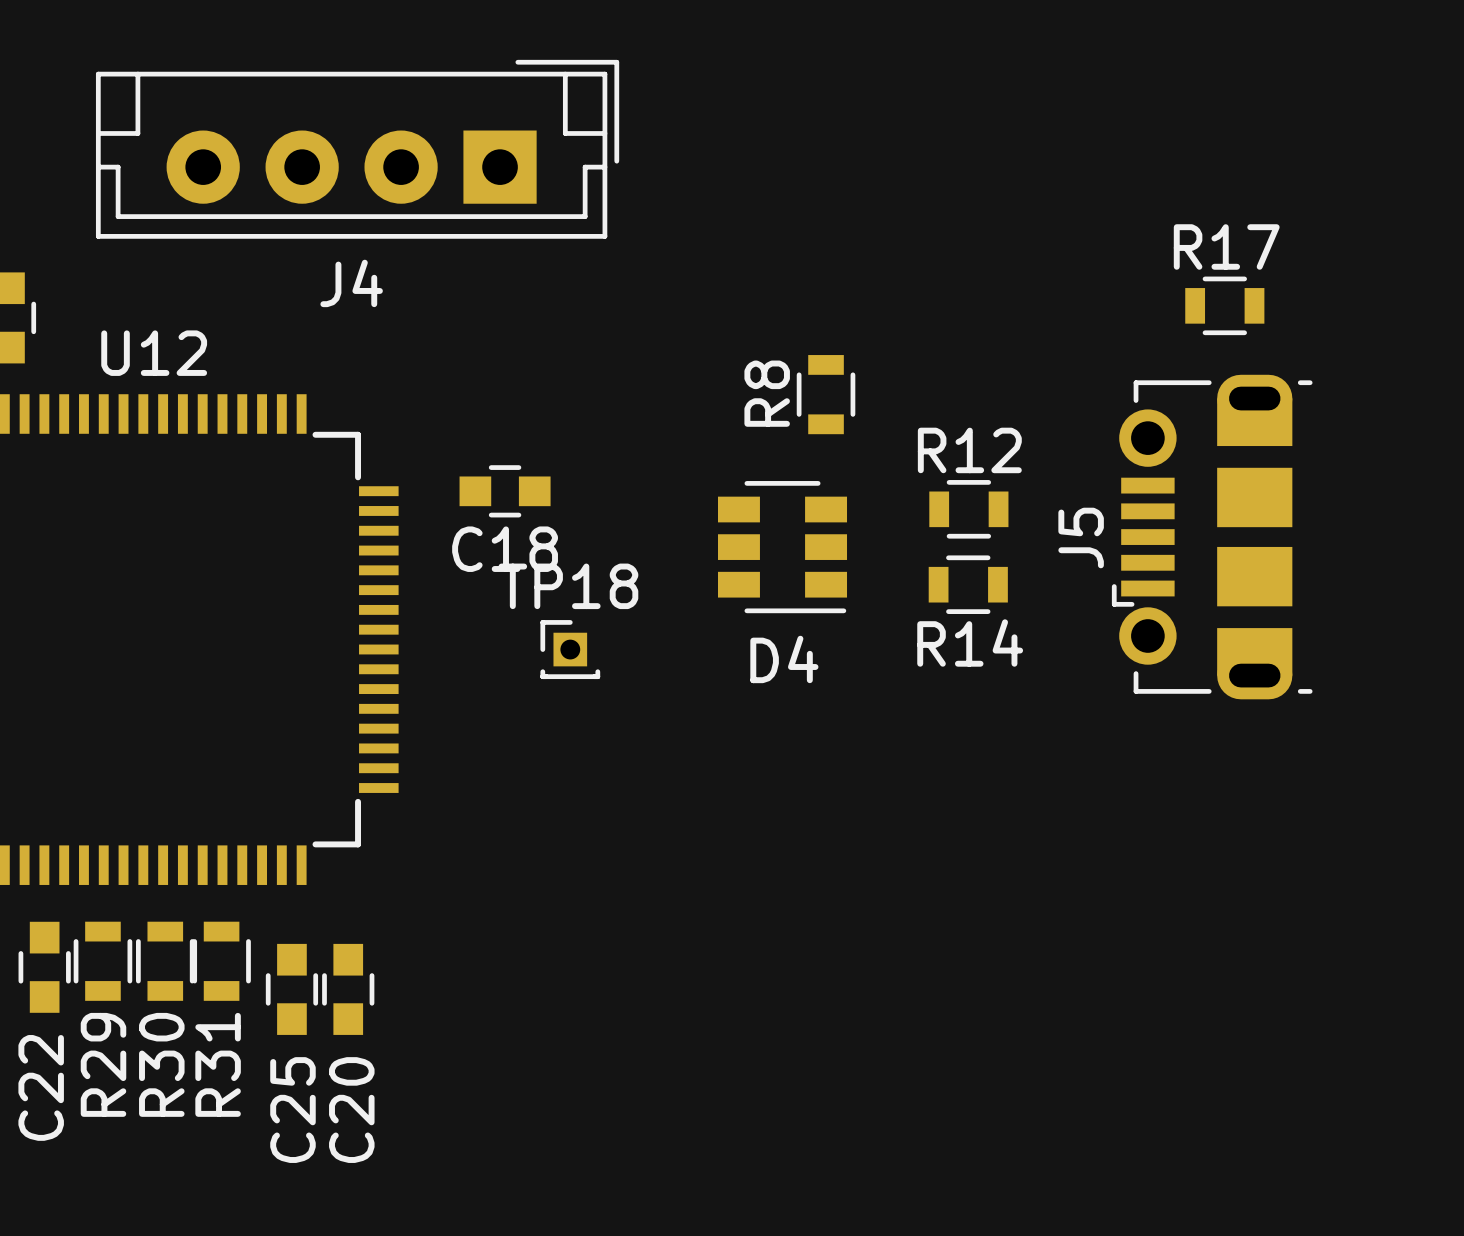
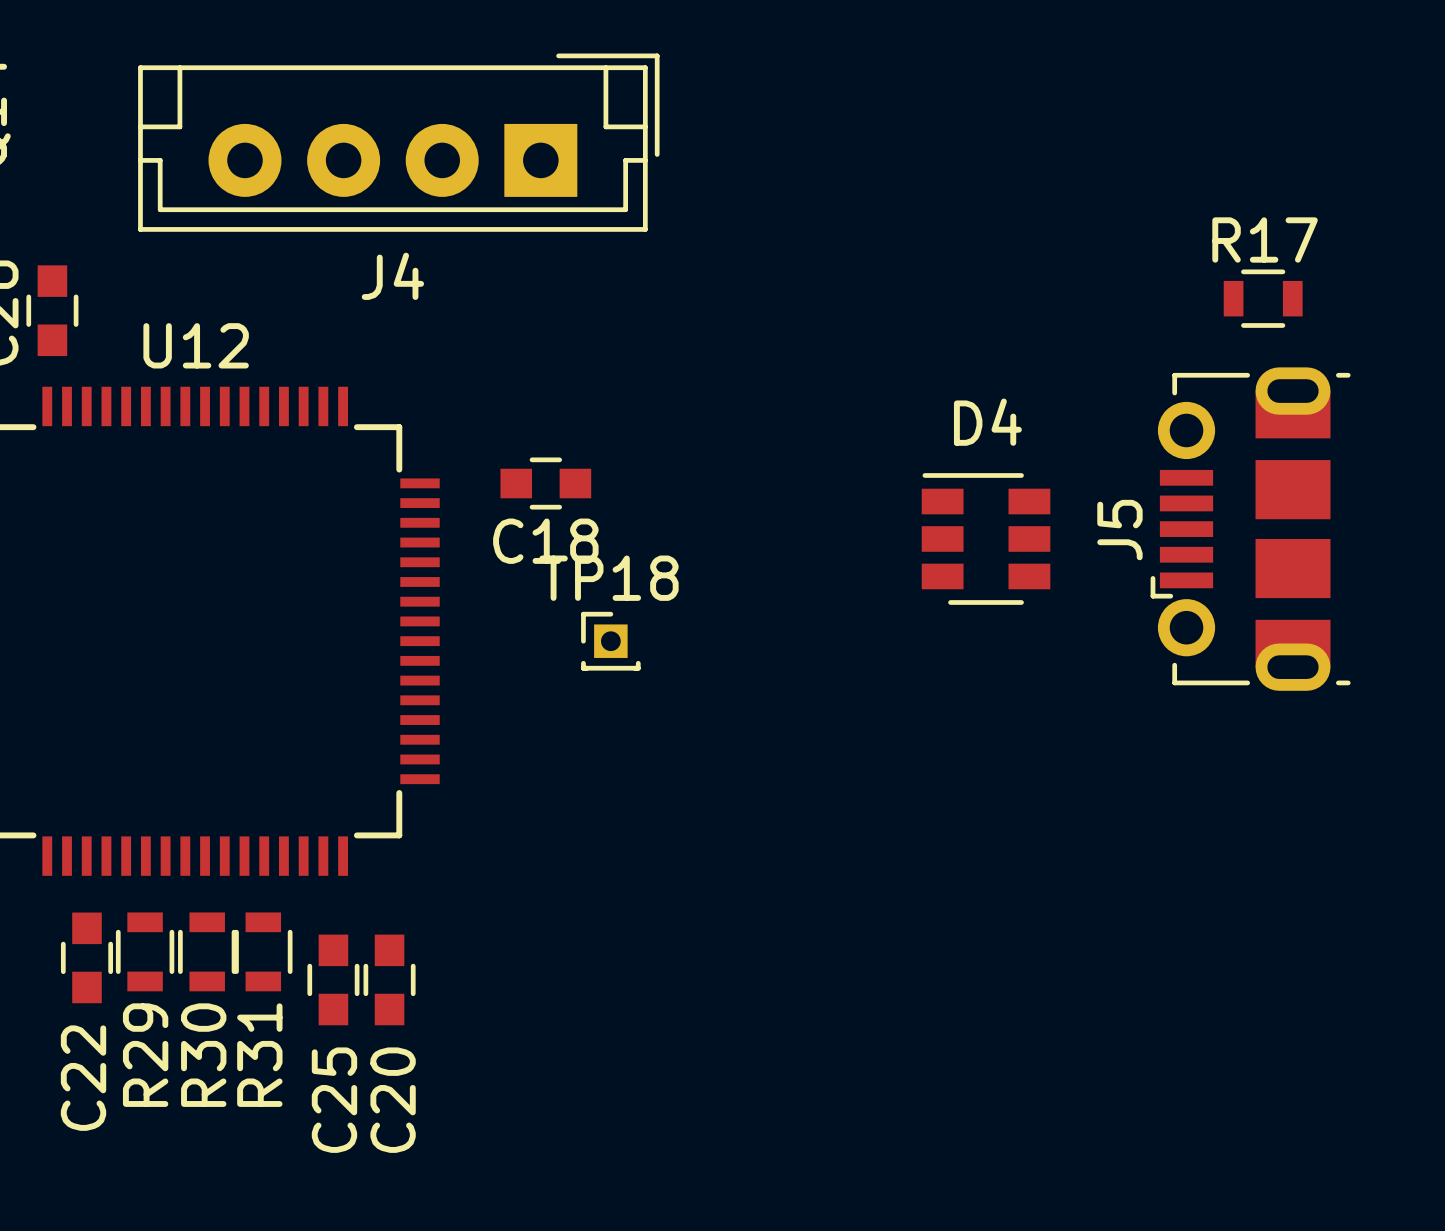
R8: (826, 394) -> none
R12: (968, 509) -> none
D4 rotation: 0° (782, 547) -> 180° (986, 538)
D4 position: (782, 547) -> (986, 538)
R14: (968, 584) -> none

